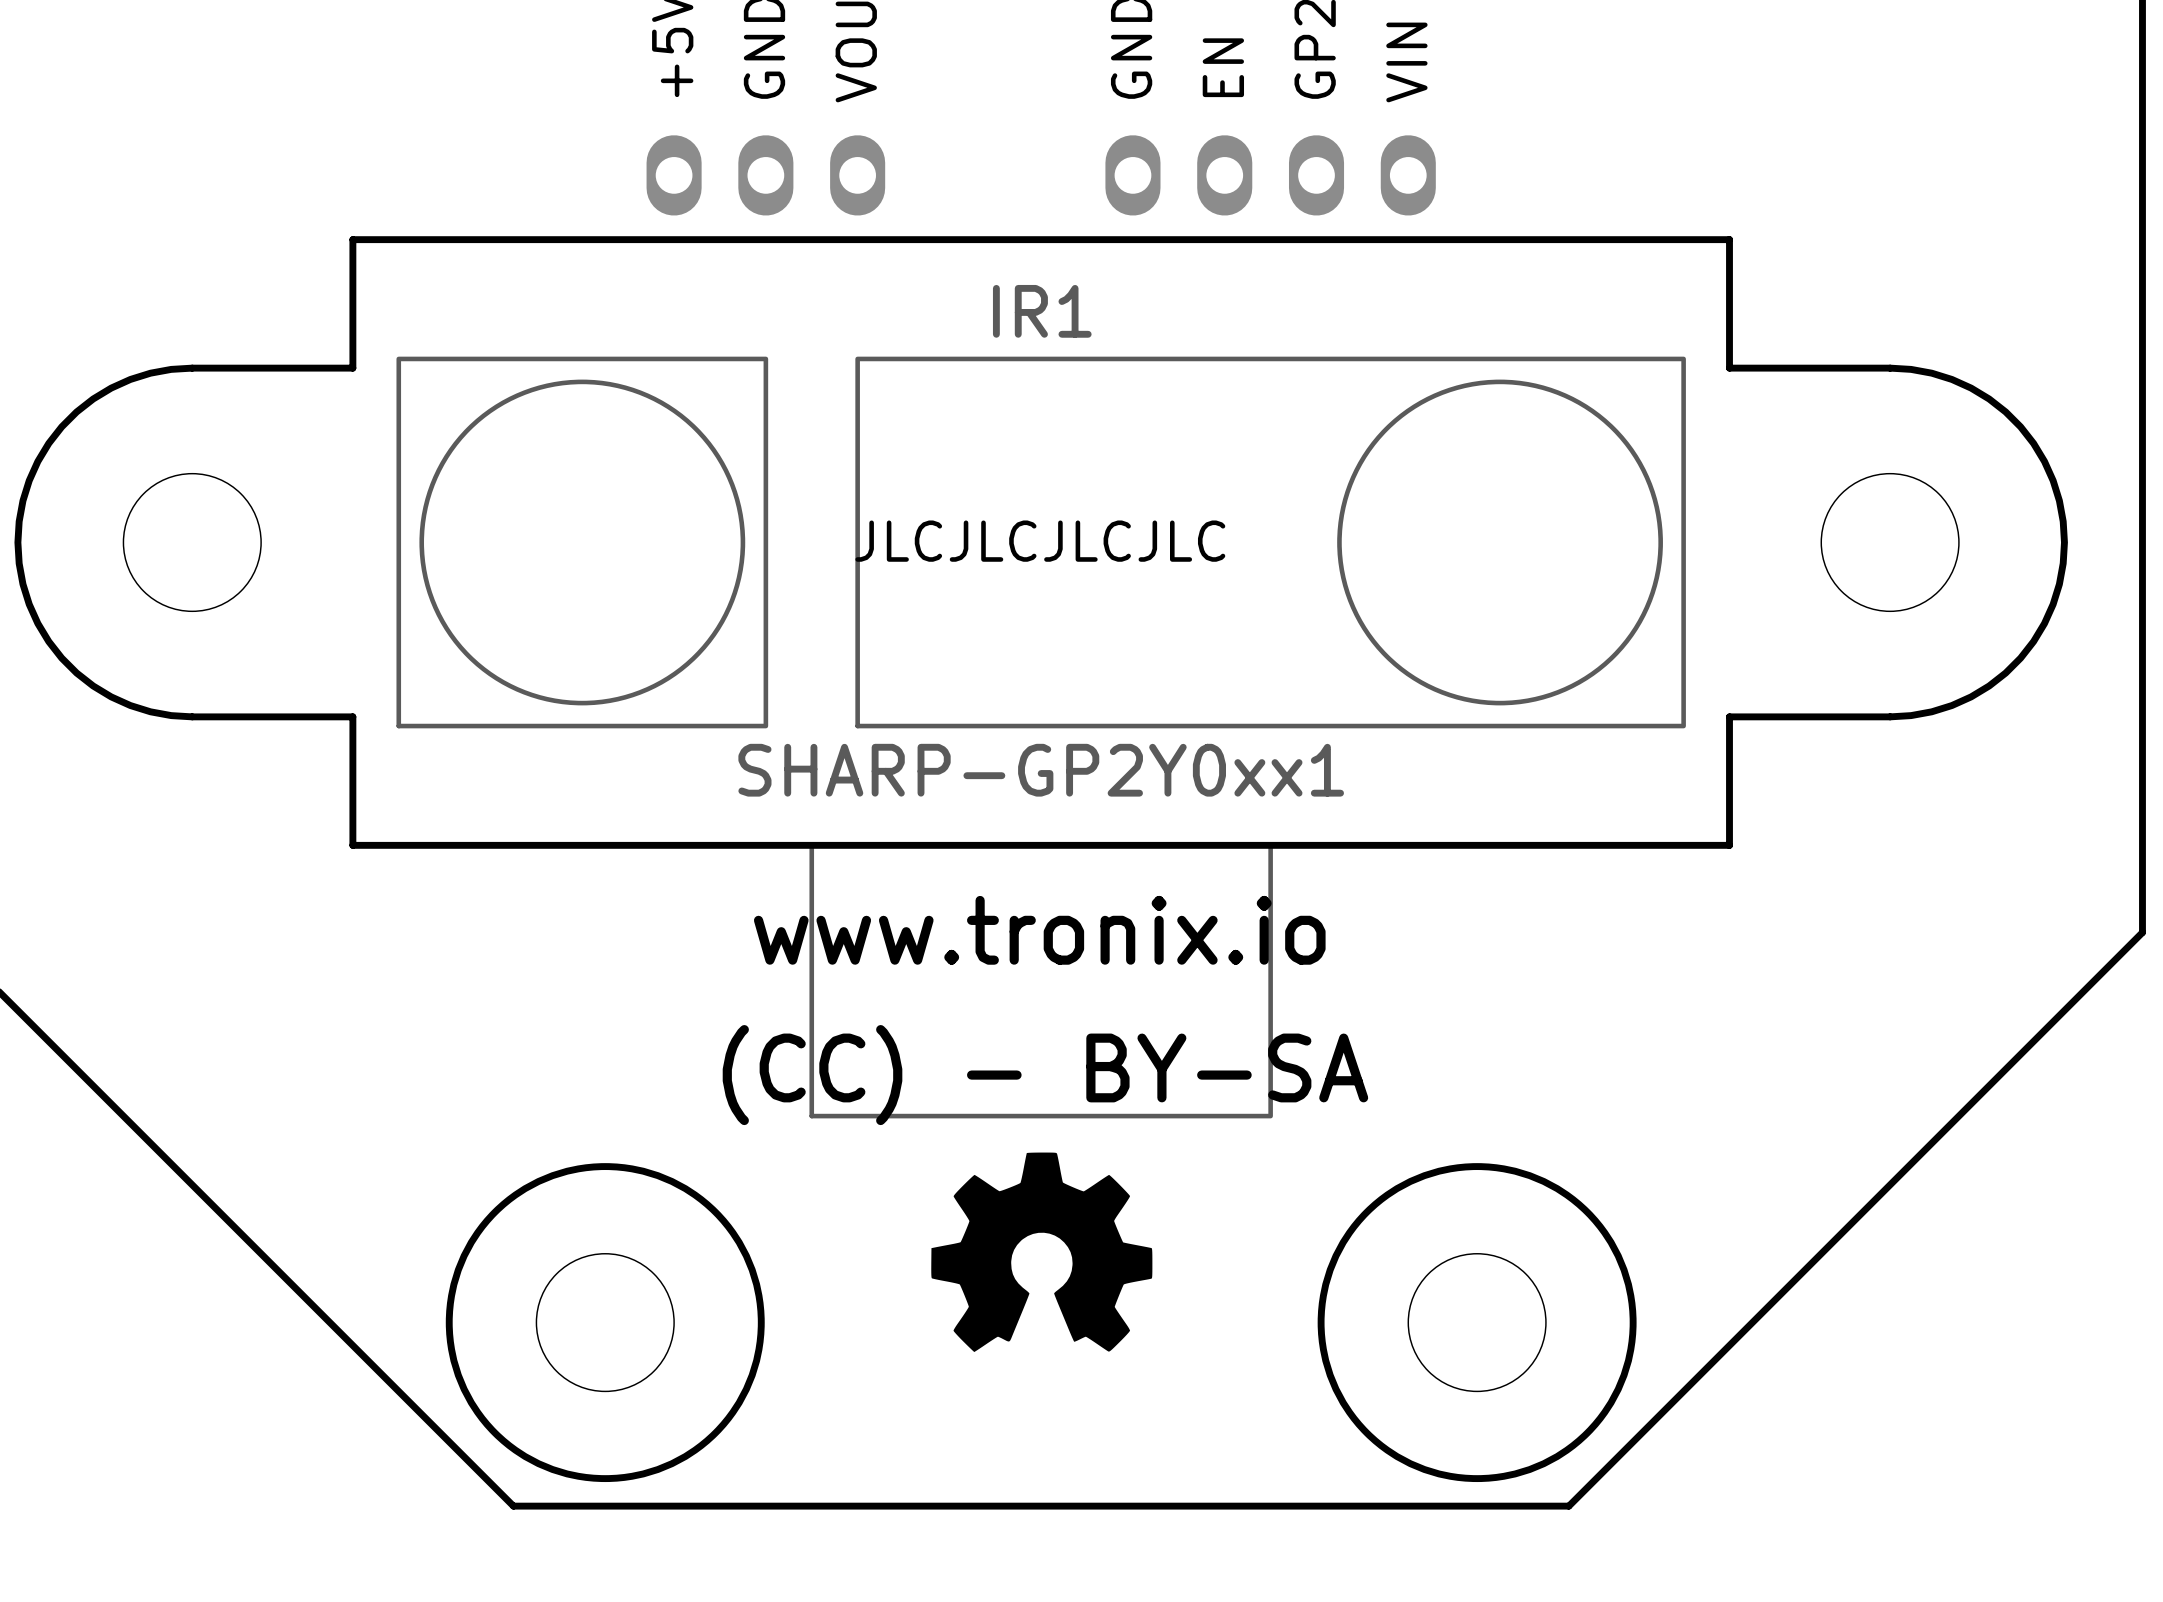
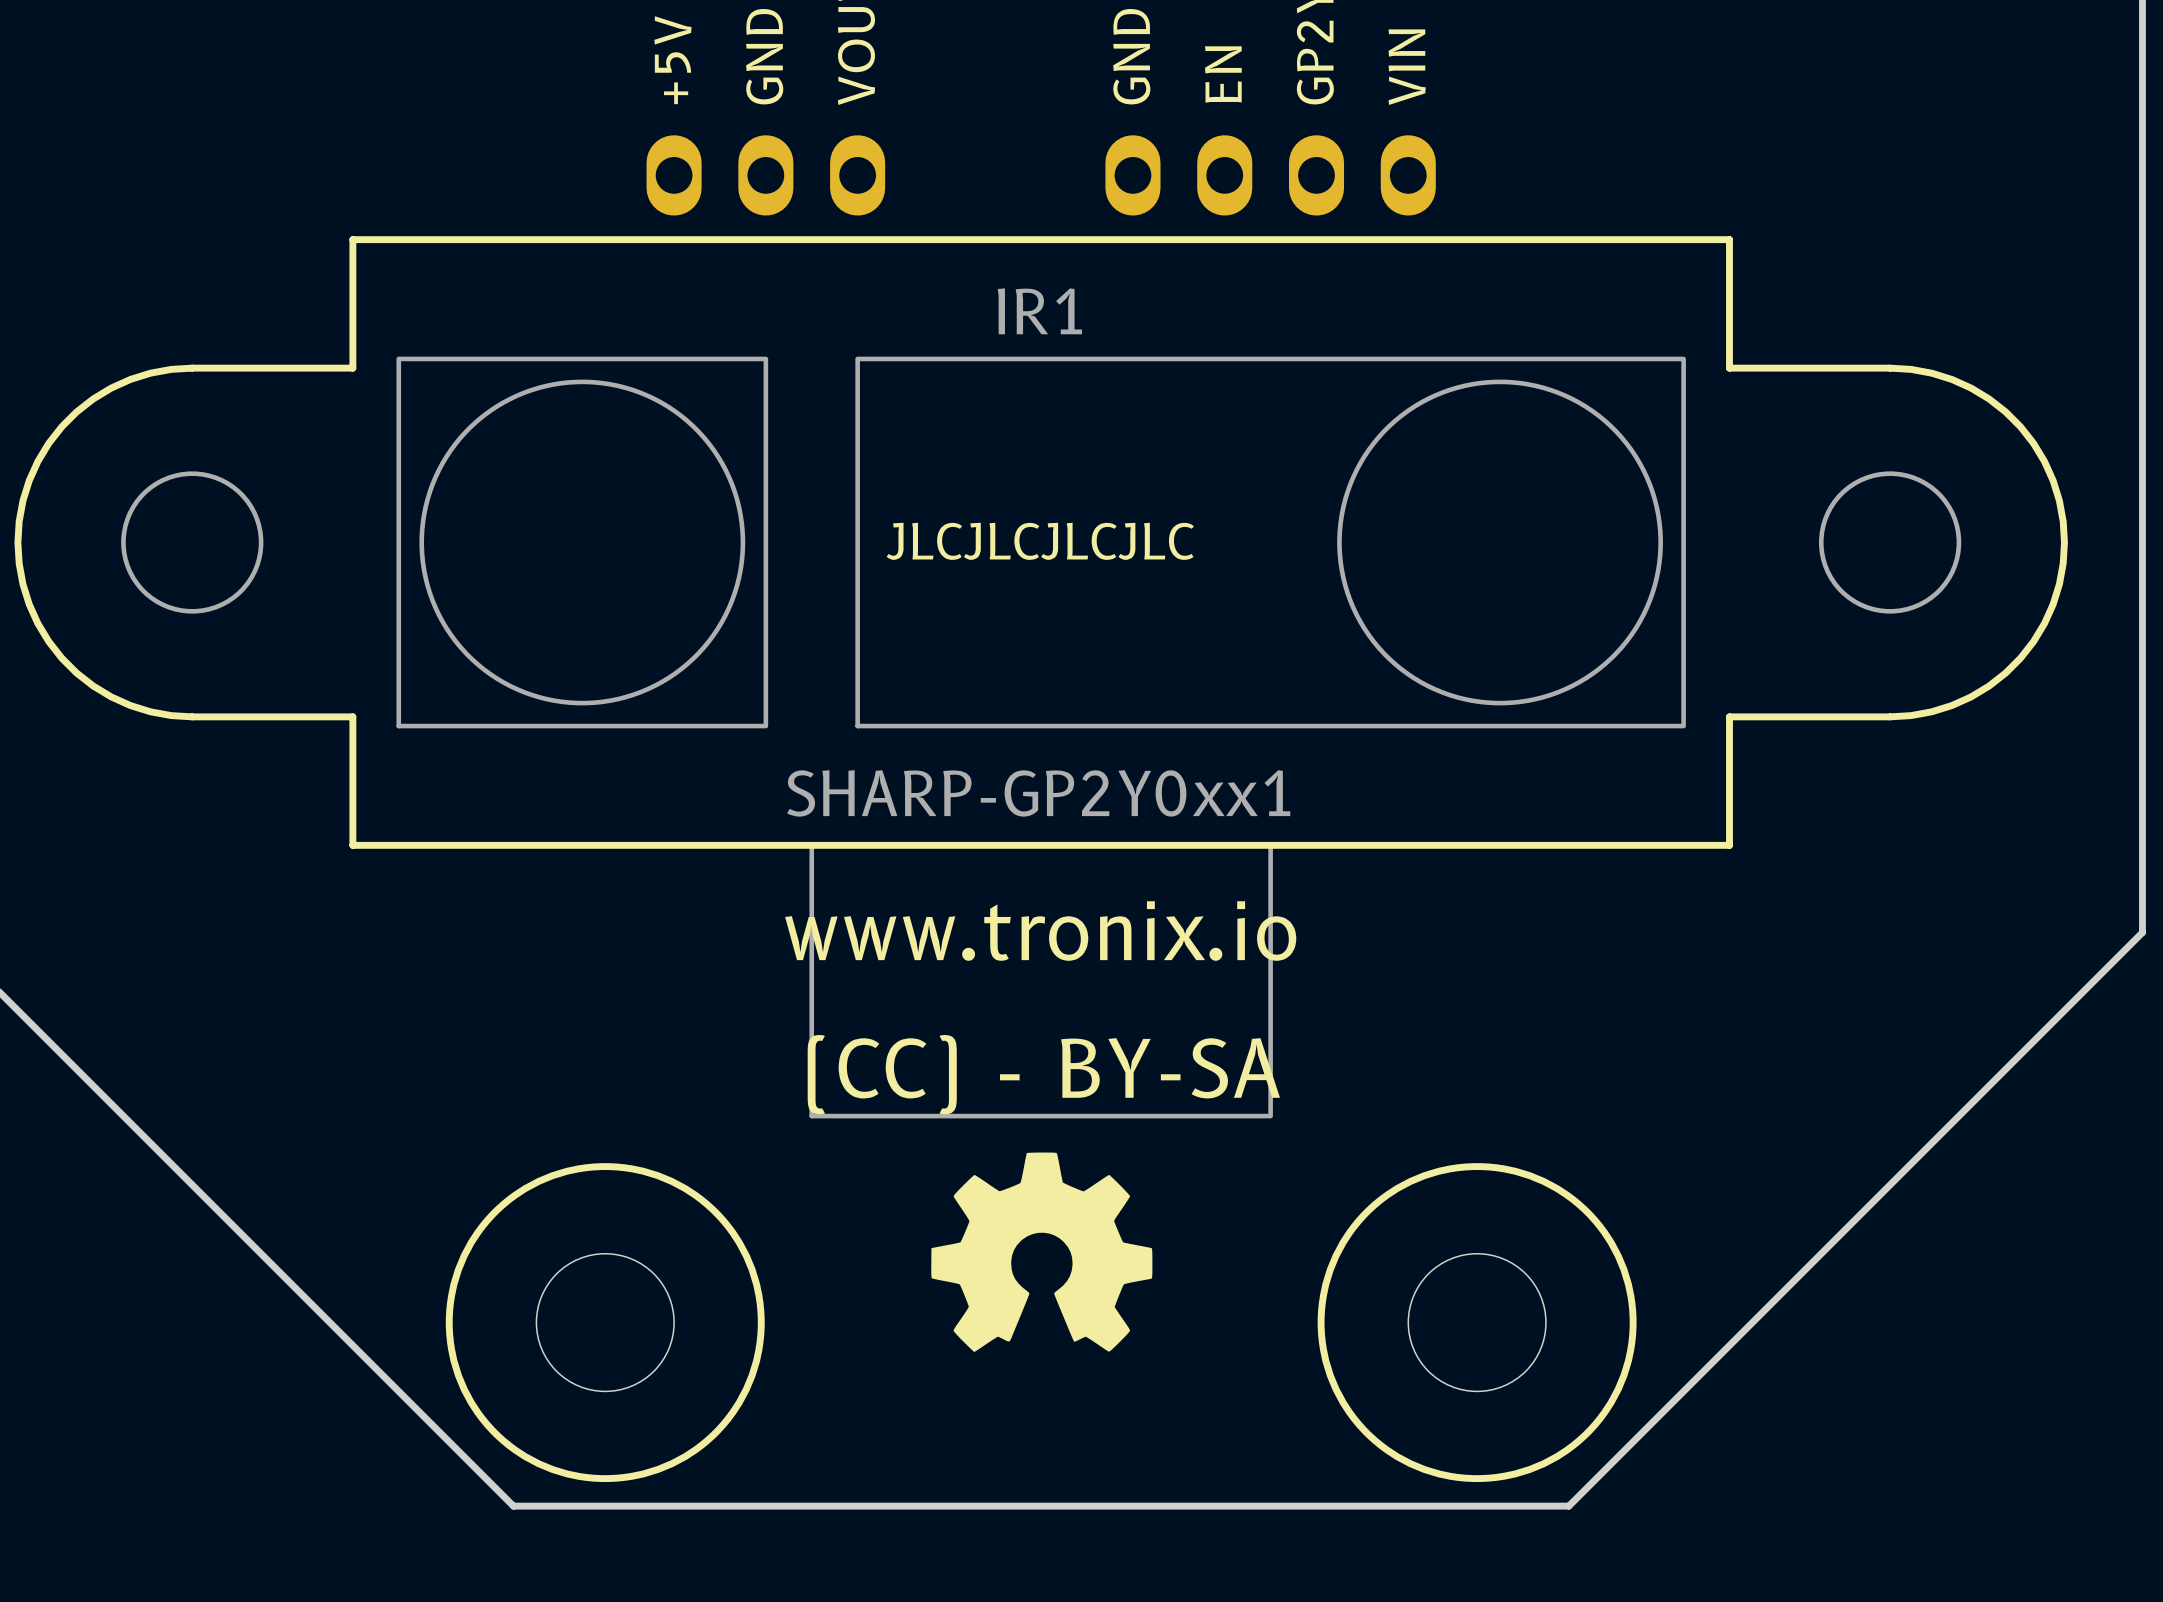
IR1 footprint: [14, 236, 2068, 1119] -> [14, 236, 2068, 1119]

